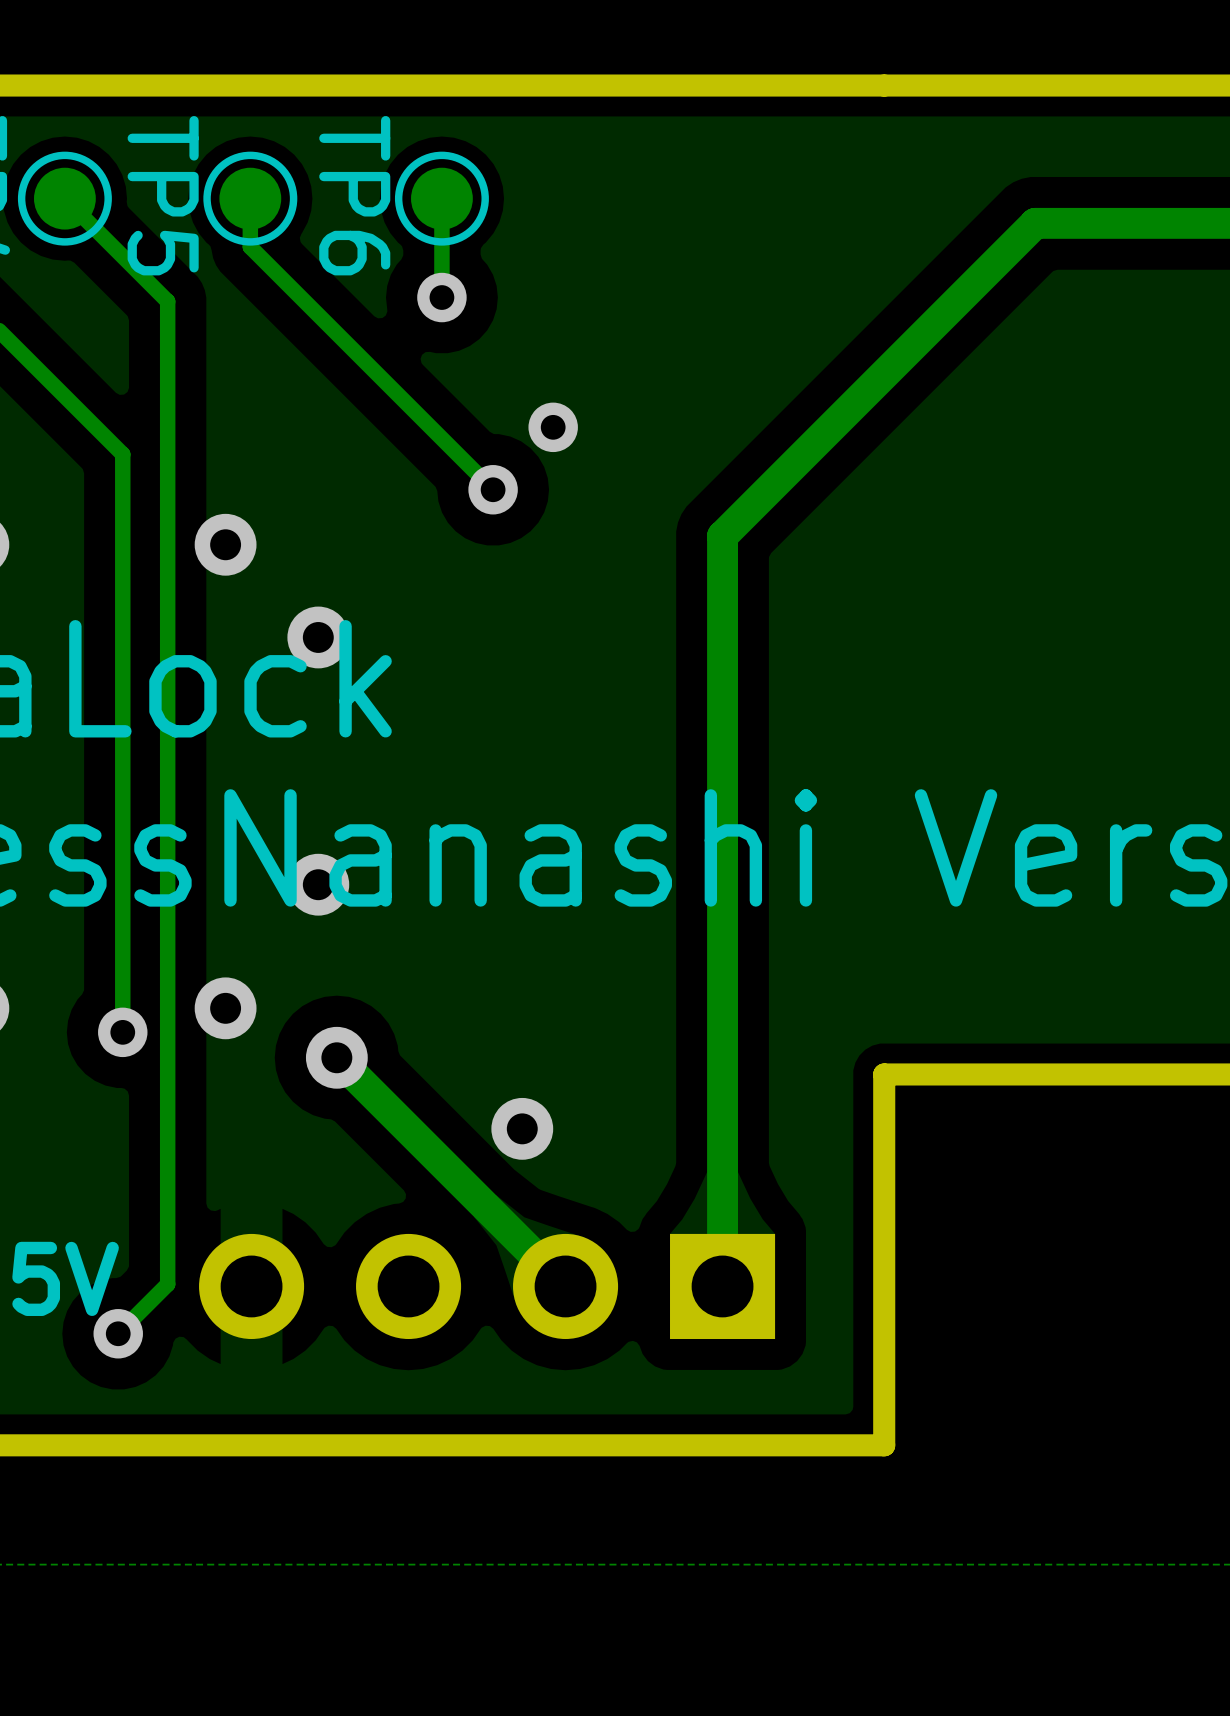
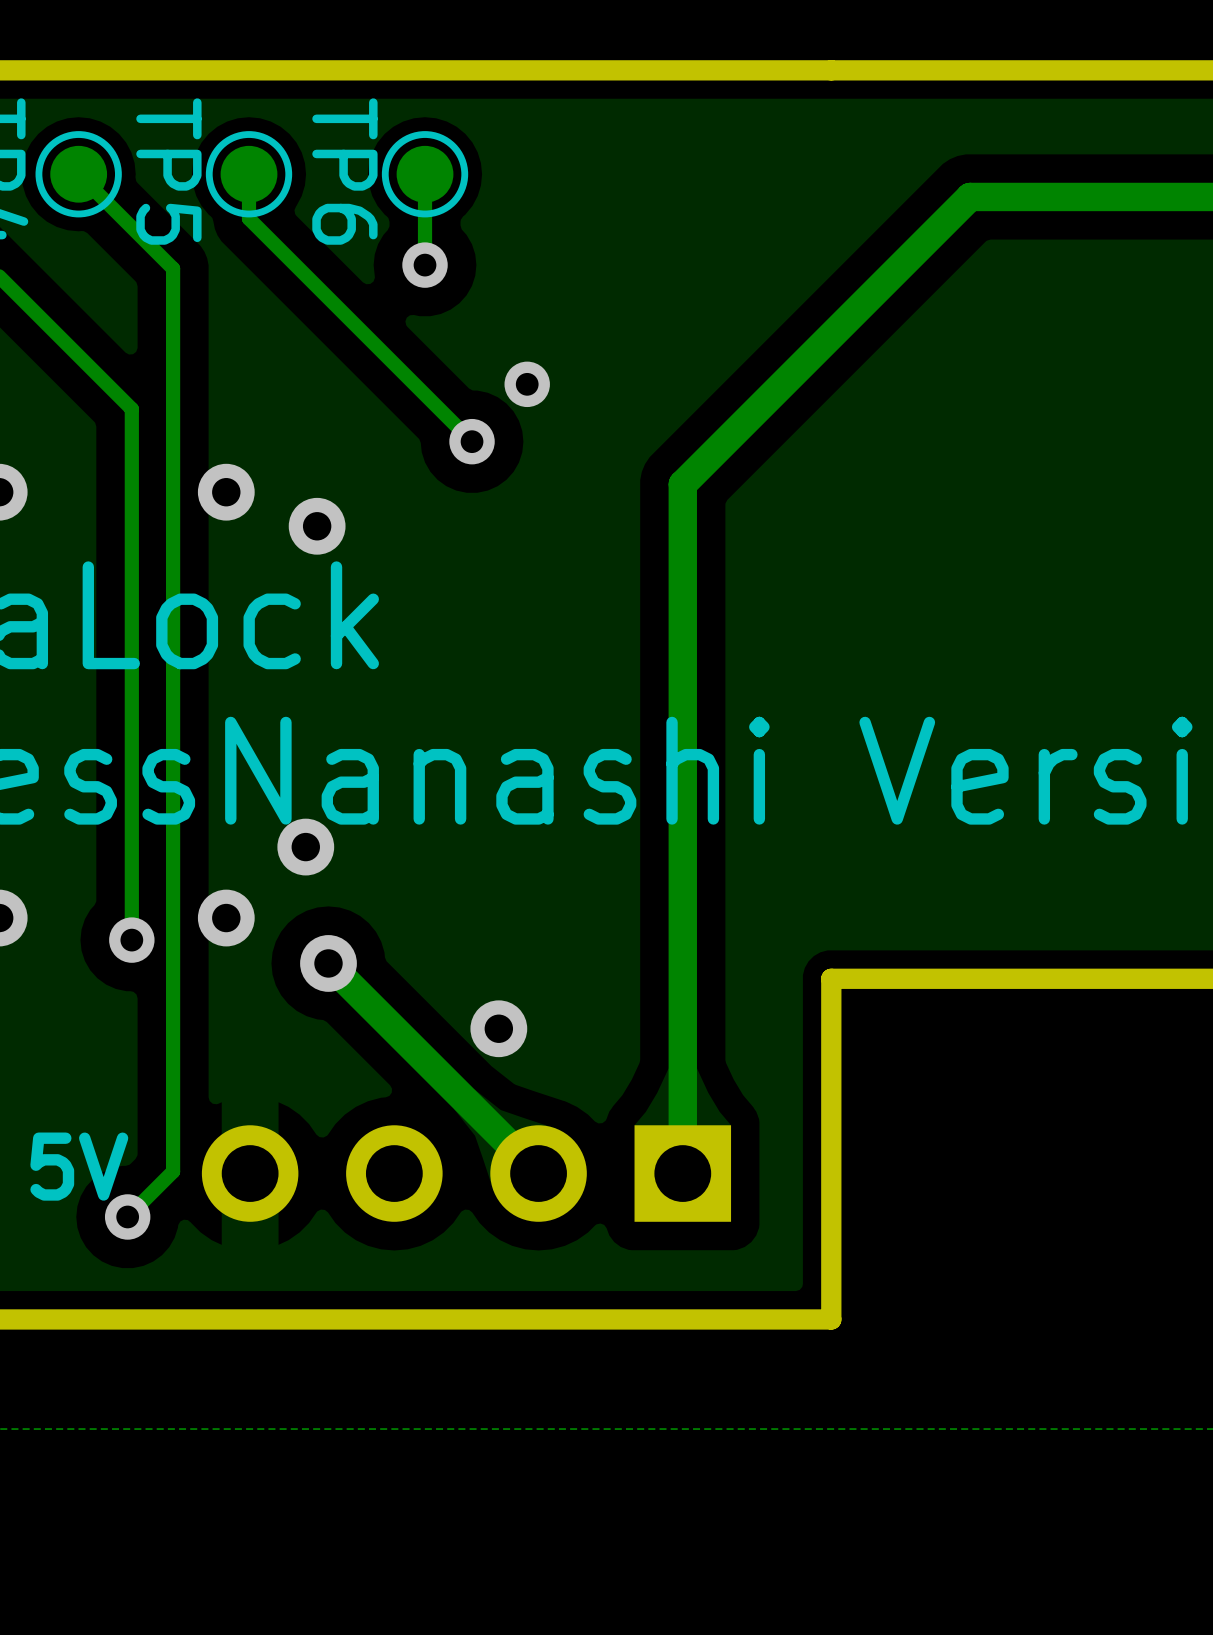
via position: (318, 637) -> (317, 526)
via position: (318, 884) -> (305, 847)

